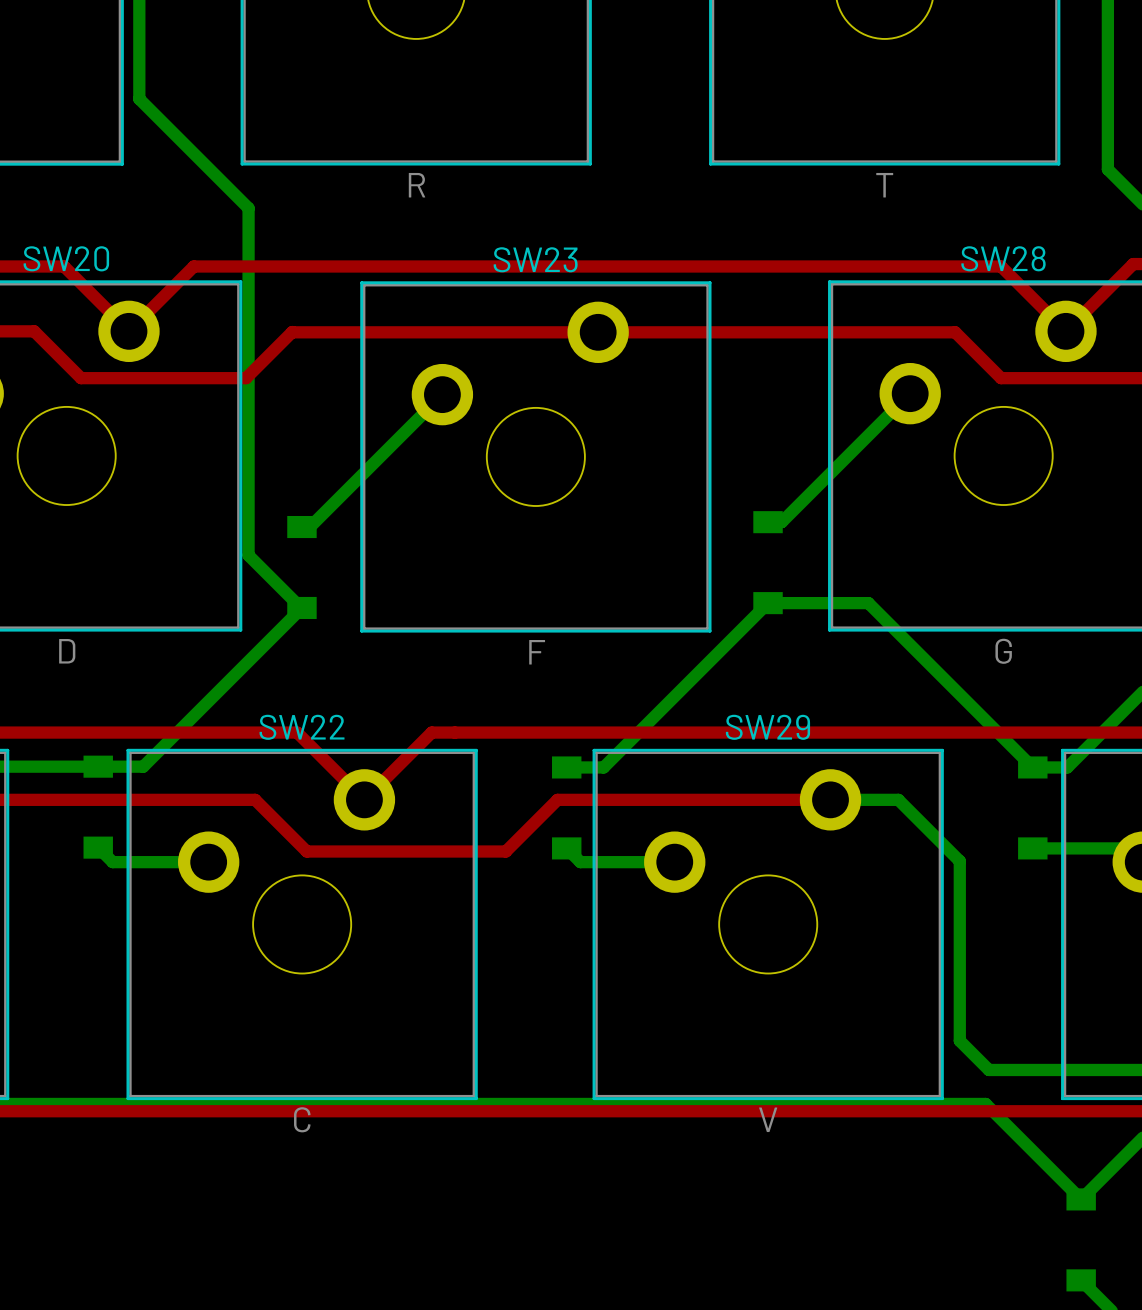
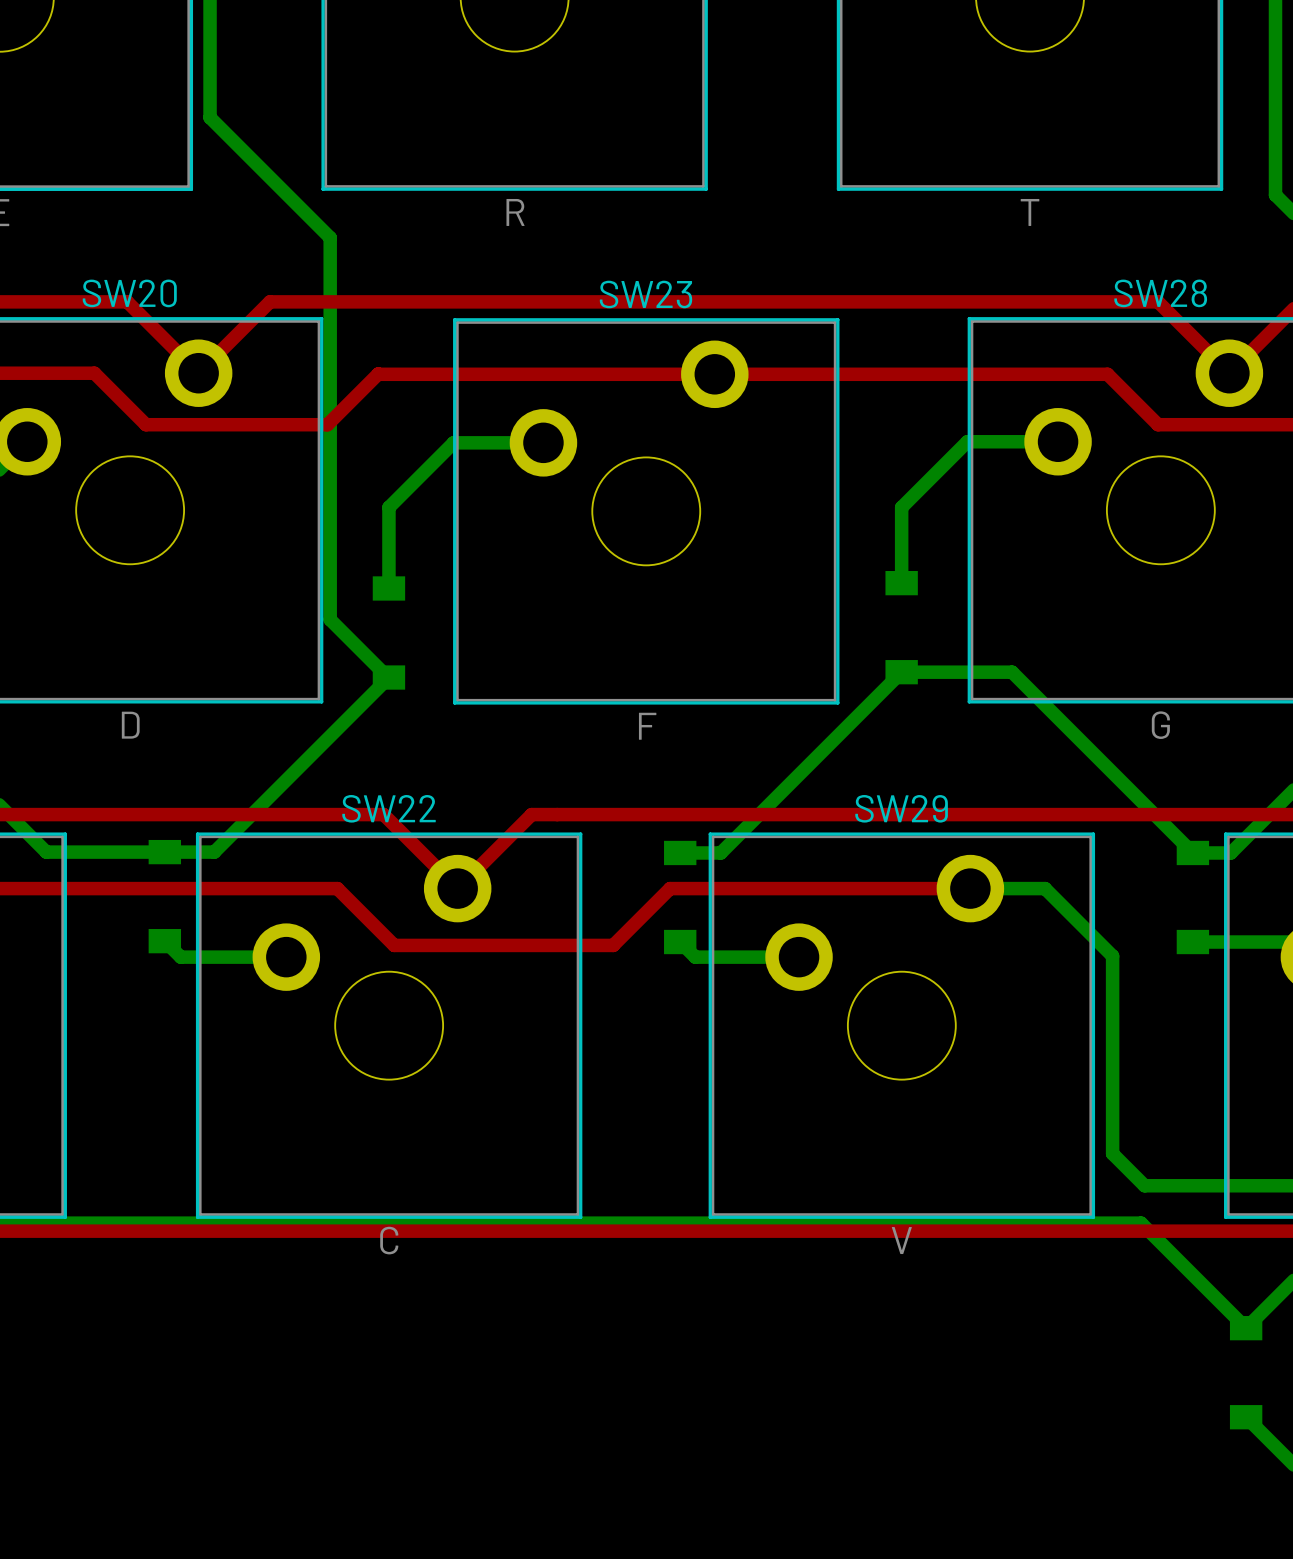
bottom track: (910, 393) (781, 522) (768, 522) -> (1058, 441) (967, 441) (901, 507) (901, 583)
bottom track: (442, 394) (310, 527) (301, 527) -> (543, 442) (453, 442) (388, 507) (388, 588)

